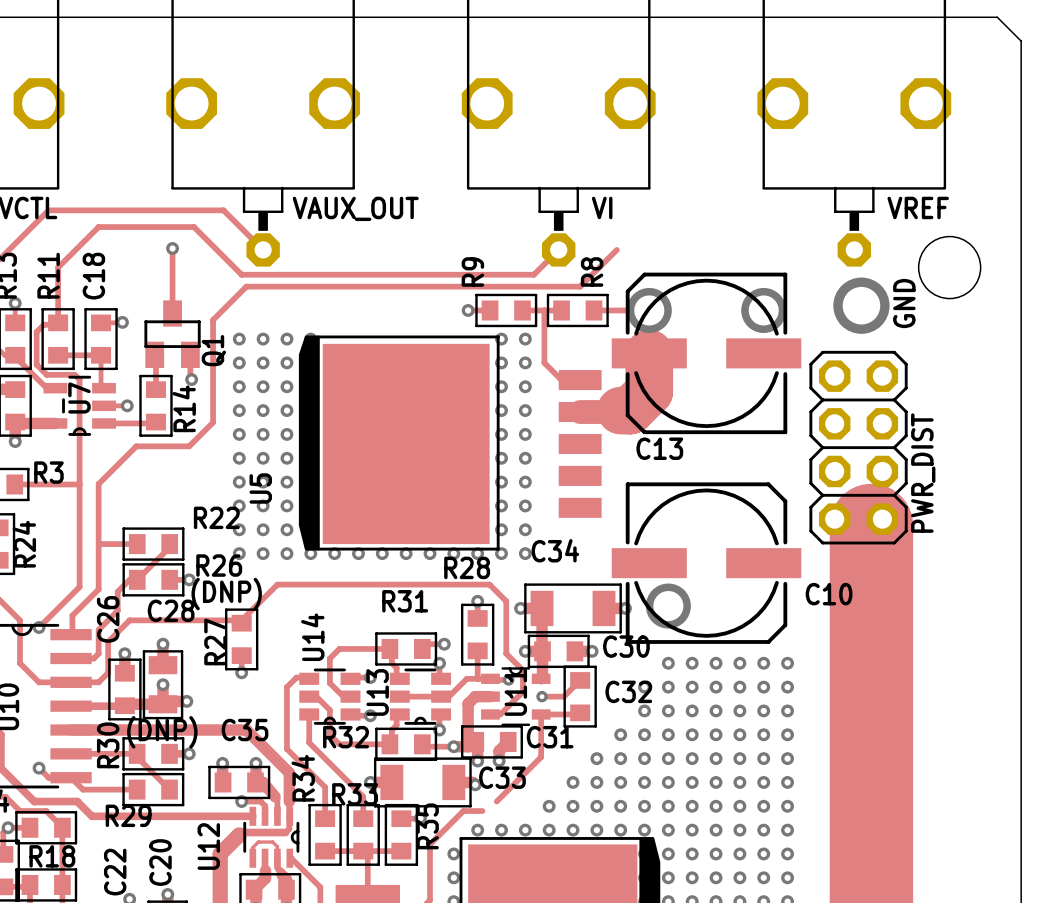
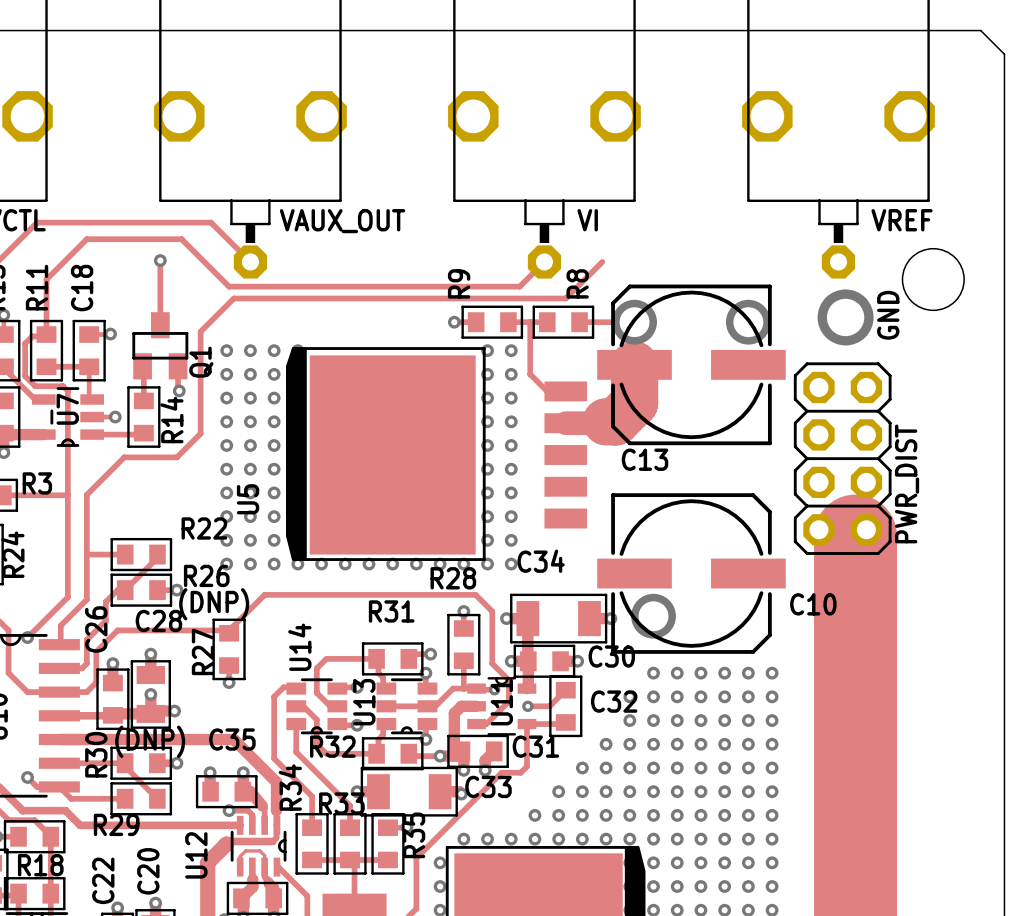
track: (534, 763) (496, 801) -> none
track: (482, 811) (463, 811) (429, 844) (429, 849) -> (520, 772) (501, 772) (416, 858)

